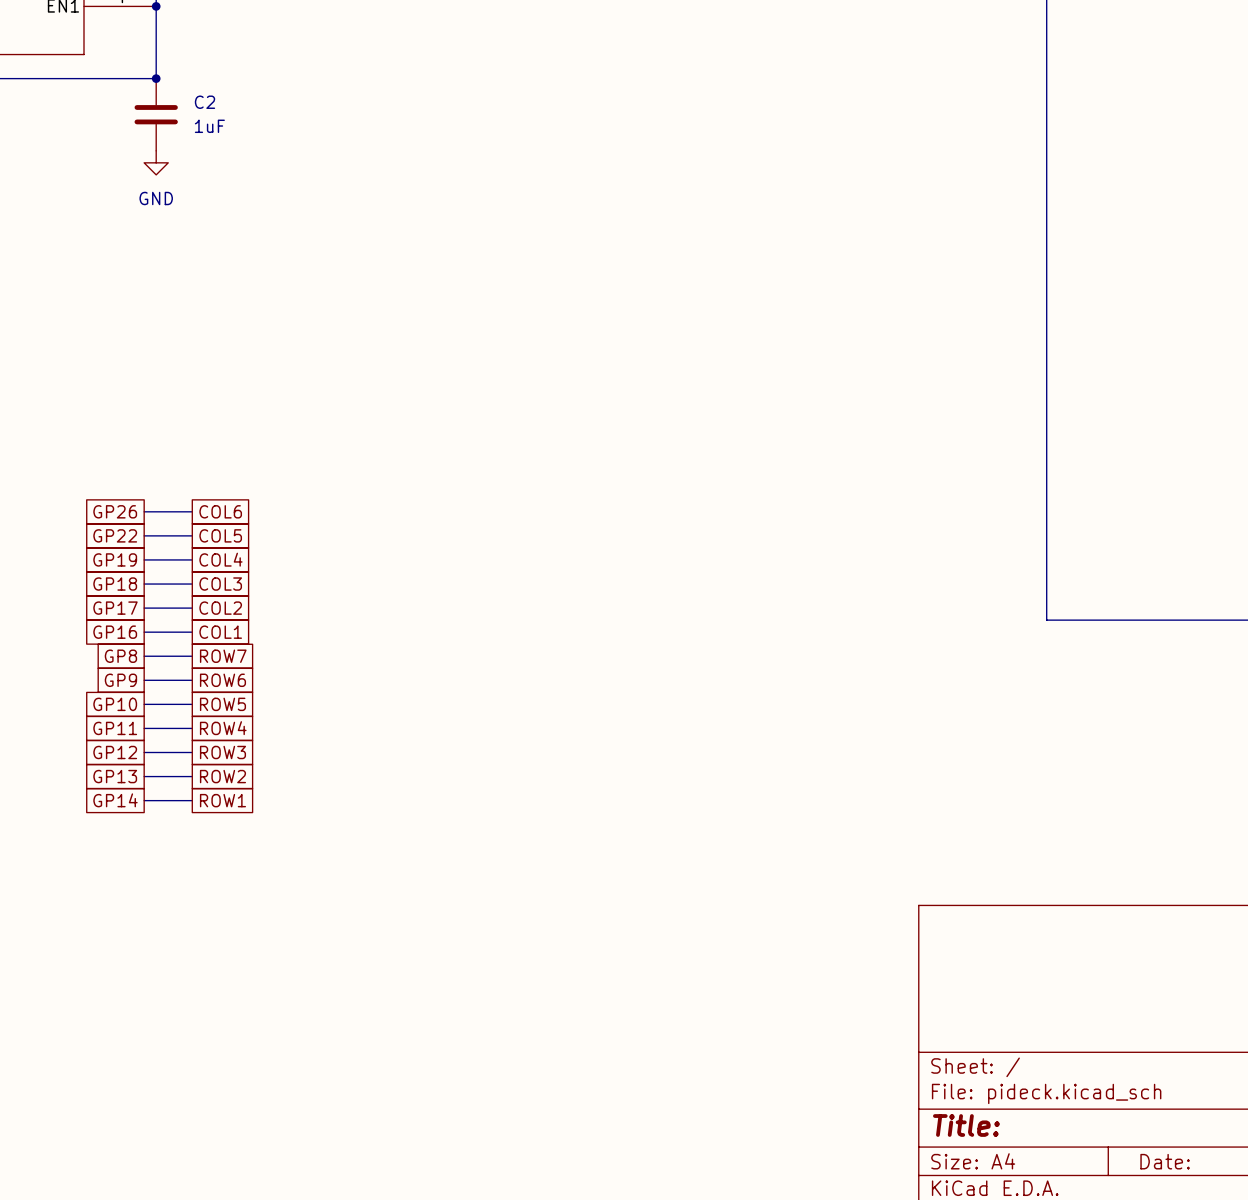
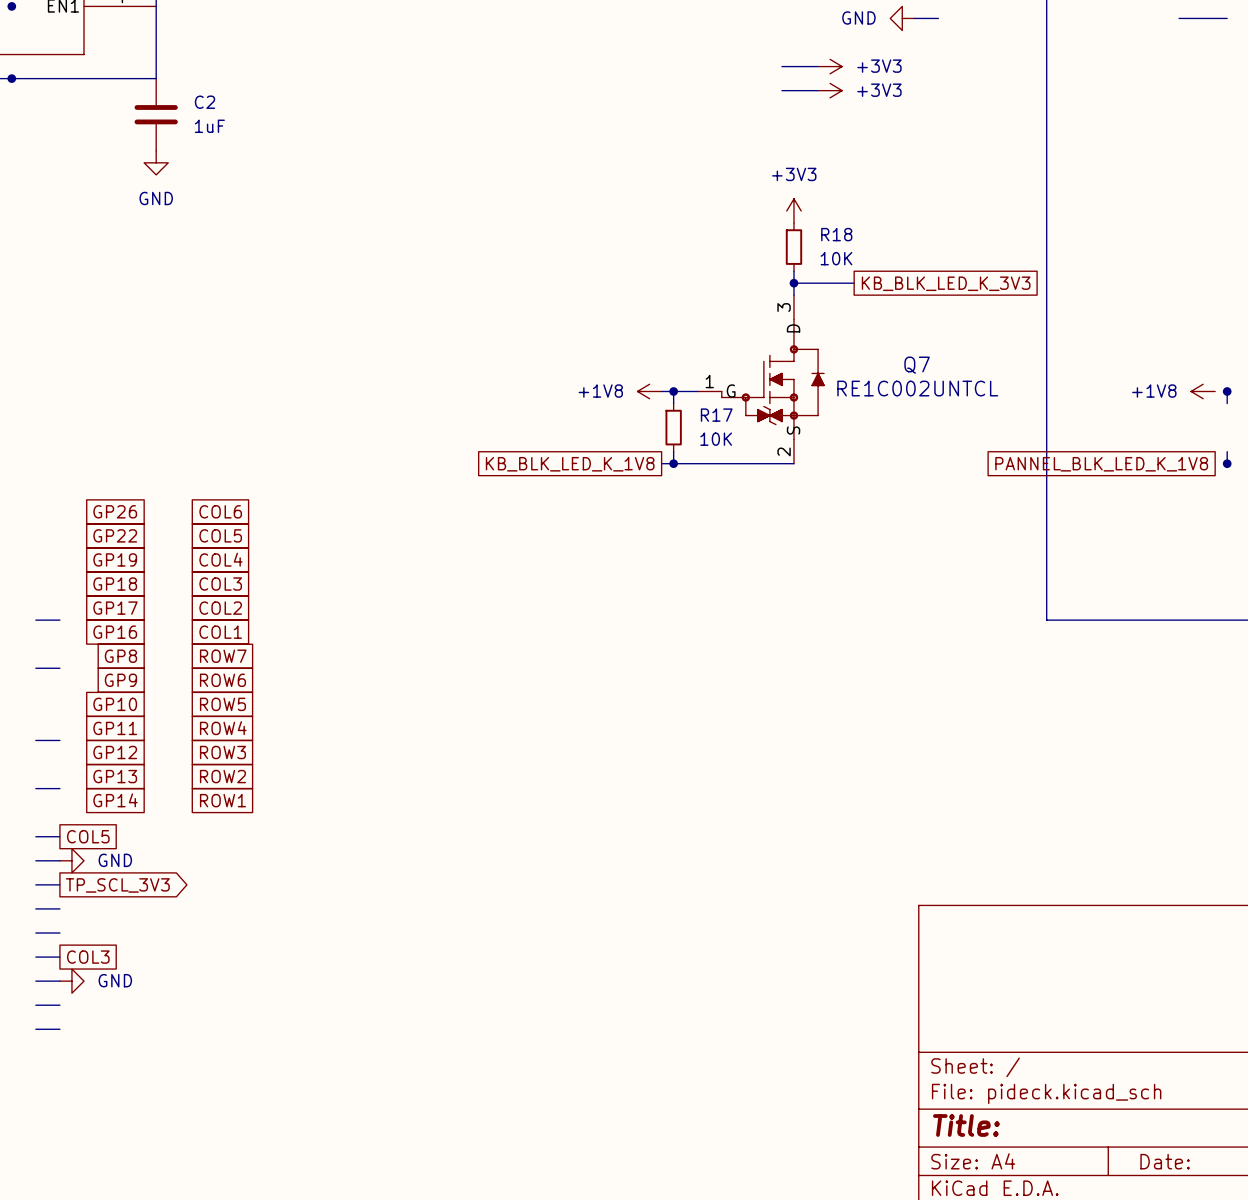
junction: none -> (11, 6)
junction: (156, 6) -> none
power symbol: none -> GND (902, 18)
wire: none -> (914, 18) (938, 18)
wire: none -> (1179, 18) (1227, 18)
wire: none -> (781, 66) (818, 66)
power symbol: none -> +3V3 (830, 66)
junction: none -> (11, 78)
junction: (156, 78) -> none
wire: none -> (781, 90) (818, 90)
power symbol: none -> +3V3 (830, 90)
power symbol: none -> +3V3 (793, 210)
R18: none -> 10K (793, 247)
wire: none -> (793, 271) (793, 295)
wire: none -> (793, 283) (854, 283)
junction: none -> (793, 283)
global label: none -> KB_BLK_LED_K_3V3 (946, 283)
Q7: none -> RE1C002UNTCL (761, 379)
power symbol: none -> +1V8 (649, 391)
wire: none -> (661, 391) (697, 391)
wire: none -> (673, 391) (673, 403)
junction: none -> (673, 391)
power symbol: none -> +1V8 (1203, 391)
wire: none -> (1227, 391) (1227, 403)
junction: none -> (1227, 391)
R17: none -> 10K (673, 427)
wire: none -> (673, 451) (673, 463)
wire: none -> (1227, 451) (1227, 463)
wire: none -> (661, 463) (793, 463)
junction: none -> (673, 463)
junction: none -> (1227, 463)
global label: none -> KB_BLK_LED_K_1V8 (570, 464)
global label: none -> PANNEL_BLK_LED_K_1V8 (1101, 464)
wire: (144, 511) (192, 511) -> none
wire: (144, 535) (192, 535) -> none
wire: (144, 559) (192, 559) -> none
wire: (144, 584) (192, 584) -> none
wire: (144, 608) (192, 608) -> none
wire: none -> (35, 620) (59, 620)
wire: (144, 632) (192, 632) -> none
wire: (144, 656) (192, 656) -> none
wire: none -> (35, 668) (59, 668)
wire: (144, 680) (192, 680) -> none
wire: (144, 704) (192, 704) -> none
wire: (144, 728) (192, 728) -> none
wire: none -> (35, 740) (59, 740)
wire: (144, 752) (192, 752) -> none
wire: (144, 776) (192, 776) -> none
wire: none -> (35, 788) (59, 788)
wire: (144, 800) (192, 800) -> none
wire: none -> (35, 836) (59, 836)
global label: none -> COL5 (88, 836)
wire: none -> (35, 860) (59, 860)
power symbol: none -> GND (71, 860)
wire: none -> (35, 884) (59, 884)
global label: none -> TP_SCL_3V3 (117, 885)
wire: none -> (35, 908) (59, 908)
wire: none -> (35, 933) (59, 933)
wire: none -> (35, 957) (59, 957)
global label: none -> COL3 (88, 957)
wire: none -> (35, 981) (59, 981)
power symbol: none -> GND (71, 981)
wire: none -> (35, 1005) (59, 1005)
wire: none -> (35, 1029) (59, 1029)

